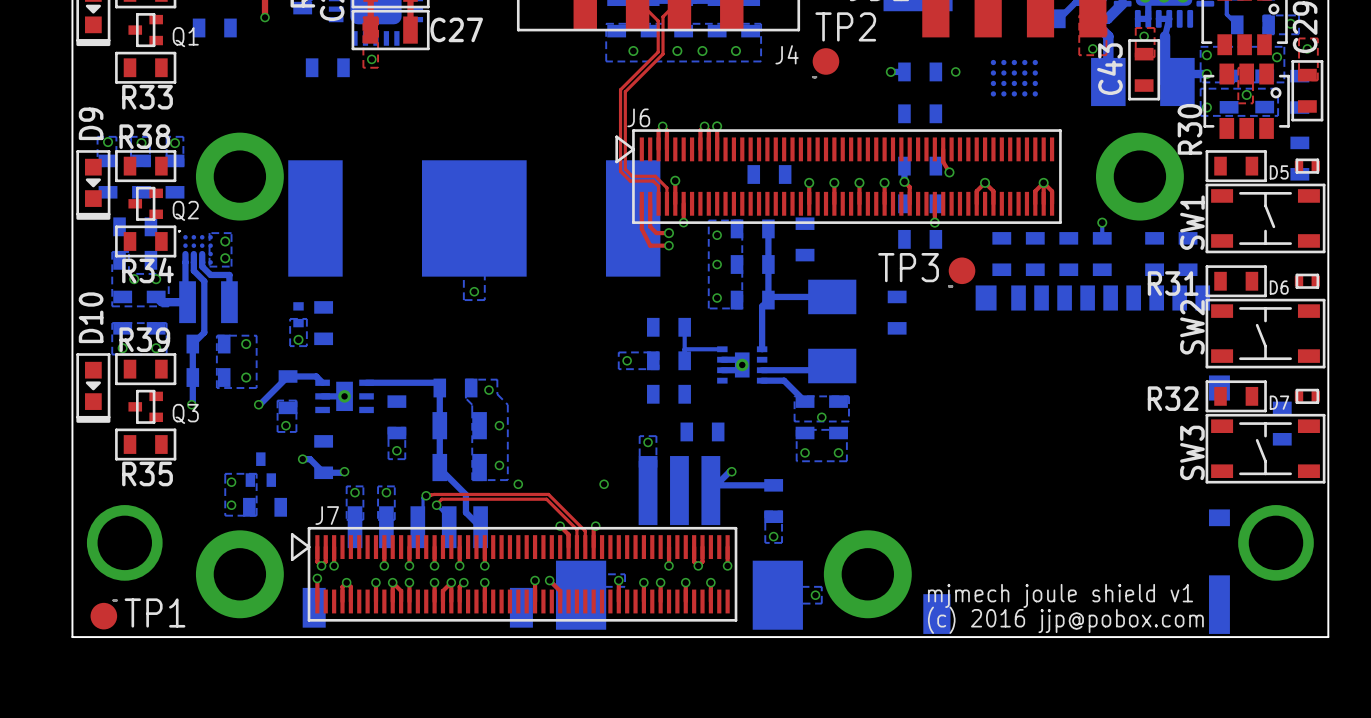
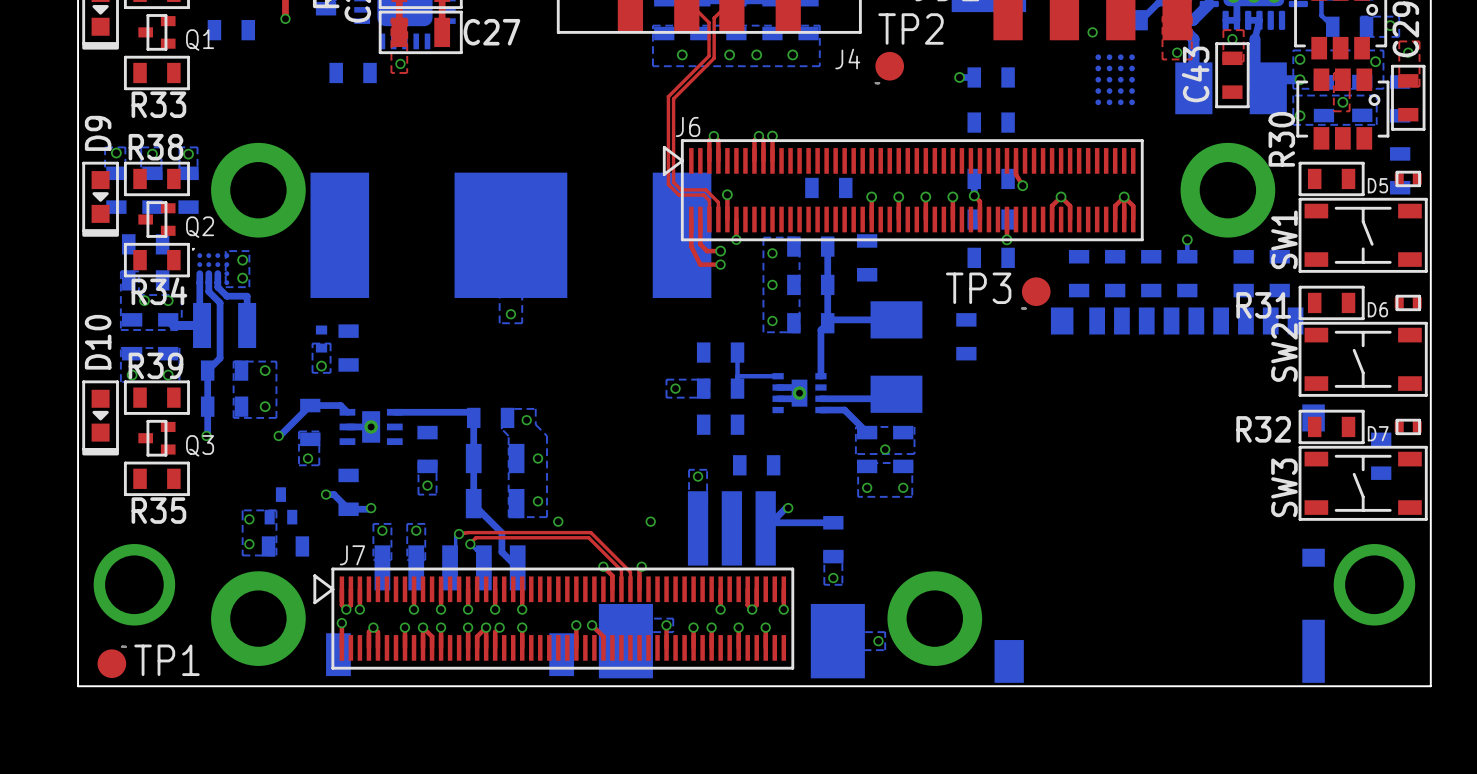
via position: (955, 71) -> (1092, 32)
part rotation: 0° (1014, 78) -> 90° clockwise (1115, 79)
text: mjmech joule shield v1 (1060, 595) -> none
text: (c) 2016 jjp@pobox.com (1065, 620) -> none

